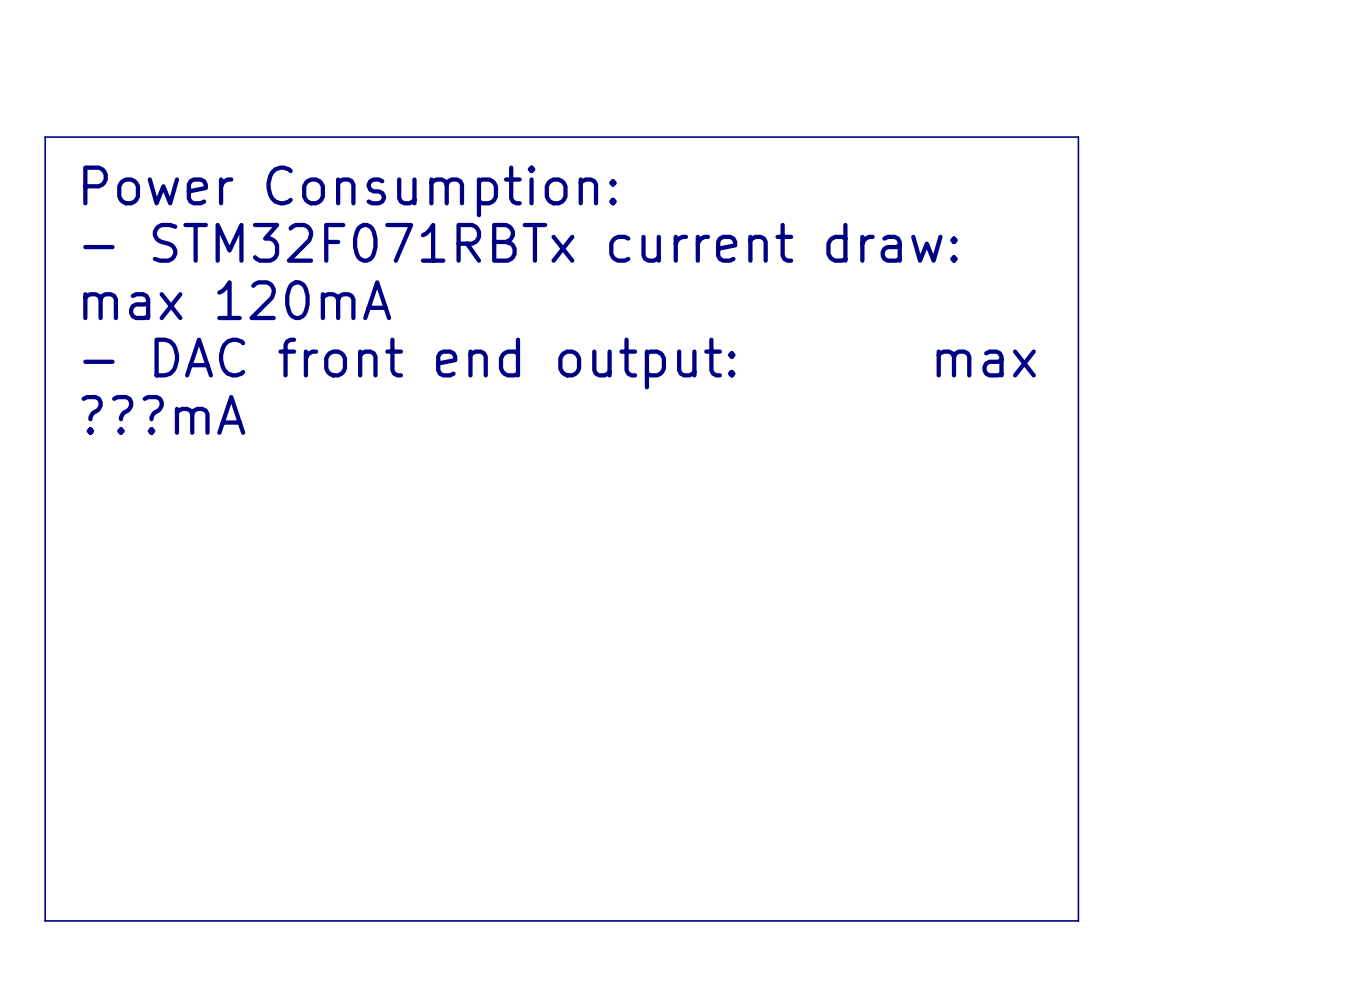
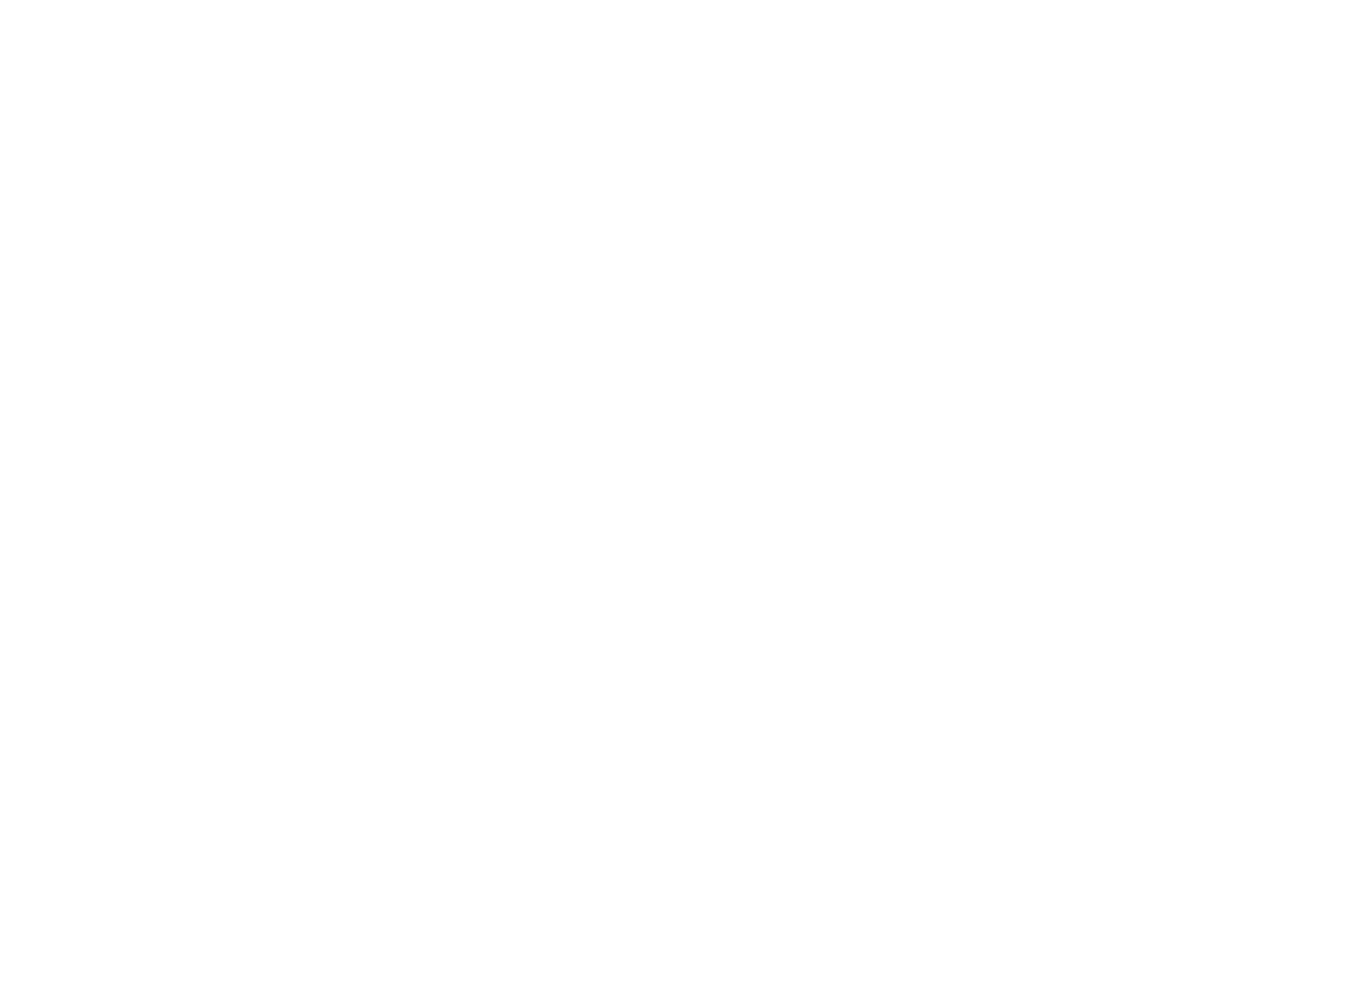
line: (45, 137) (1078, 137) (1078, 920) (45, 920) (45, 137) -> none
text: Power Consumption: (350, 191) -> none
text: - STM32F071RBTx current draw: (520, 242) -> none
text: max 120mA (237, 300) -> none
text: - DAC front end output: max (559, 363) -> none
text: ???mA (163, 414) -> none

